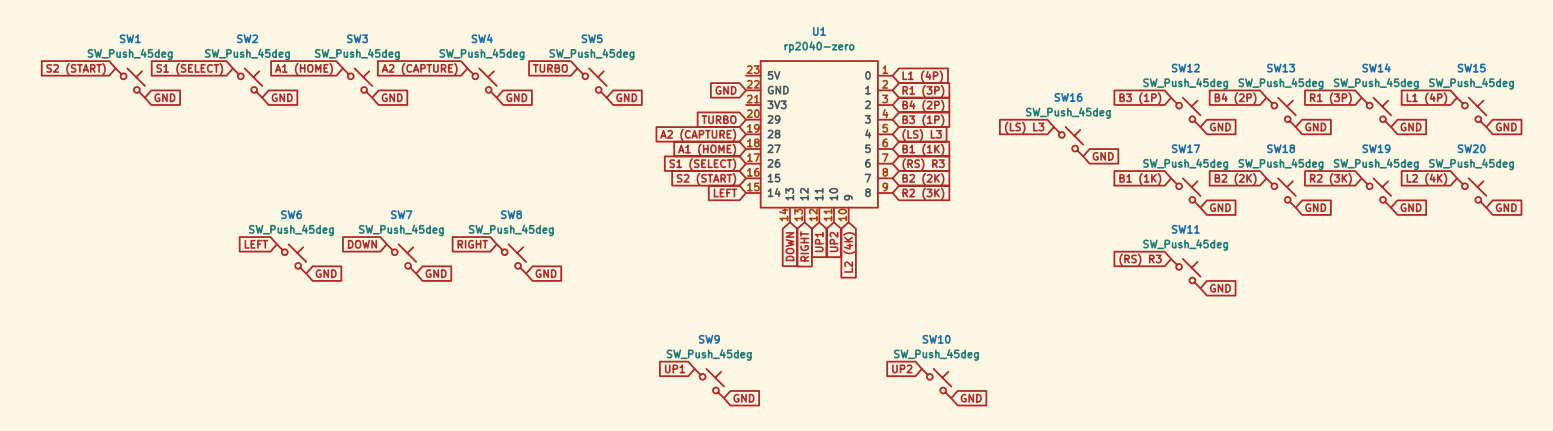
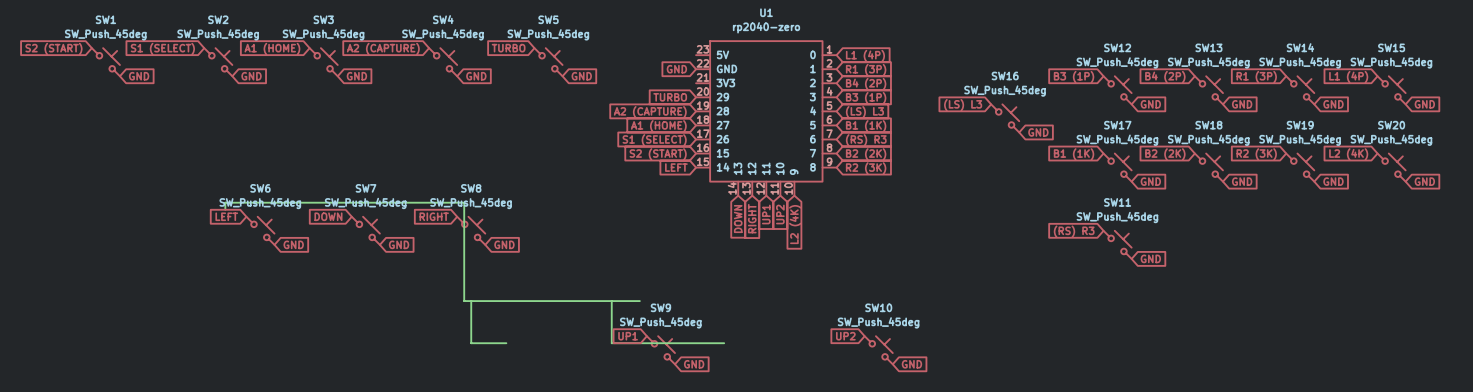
wire: none -> (225, 209) (225, 202) (464, 202) (464, 301) (639, 301)
wire: none -> (471, 301) (471, 343) (506, 343)
wire: none -> (611, 301) (611, 343) (724, 343)

